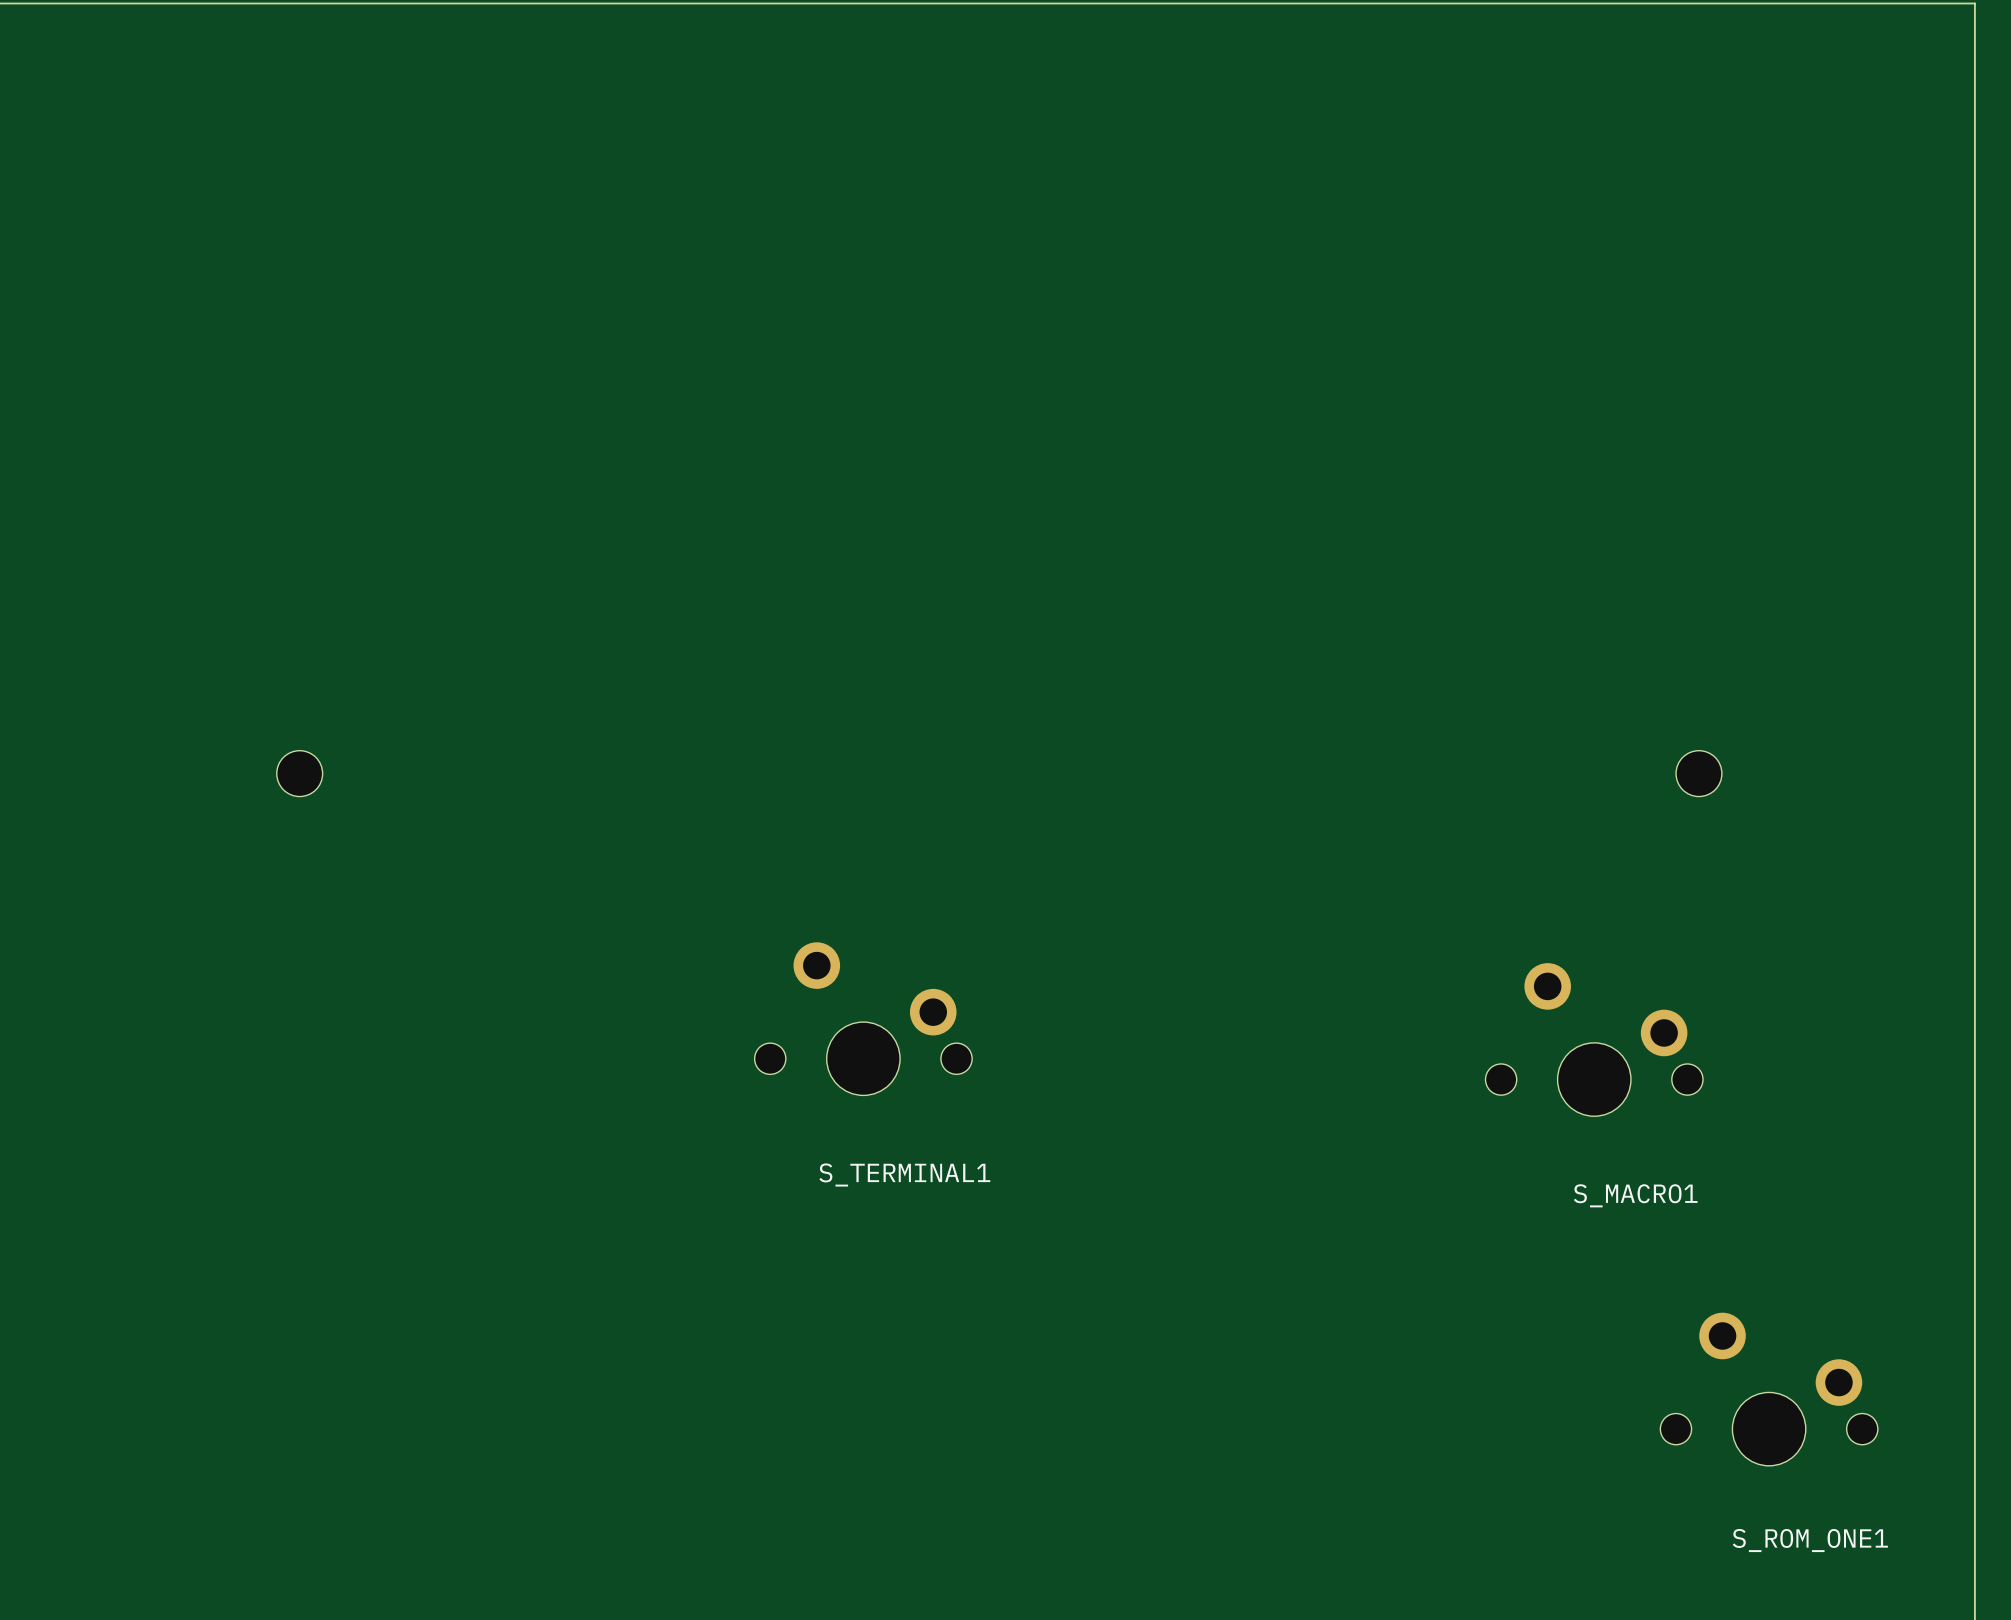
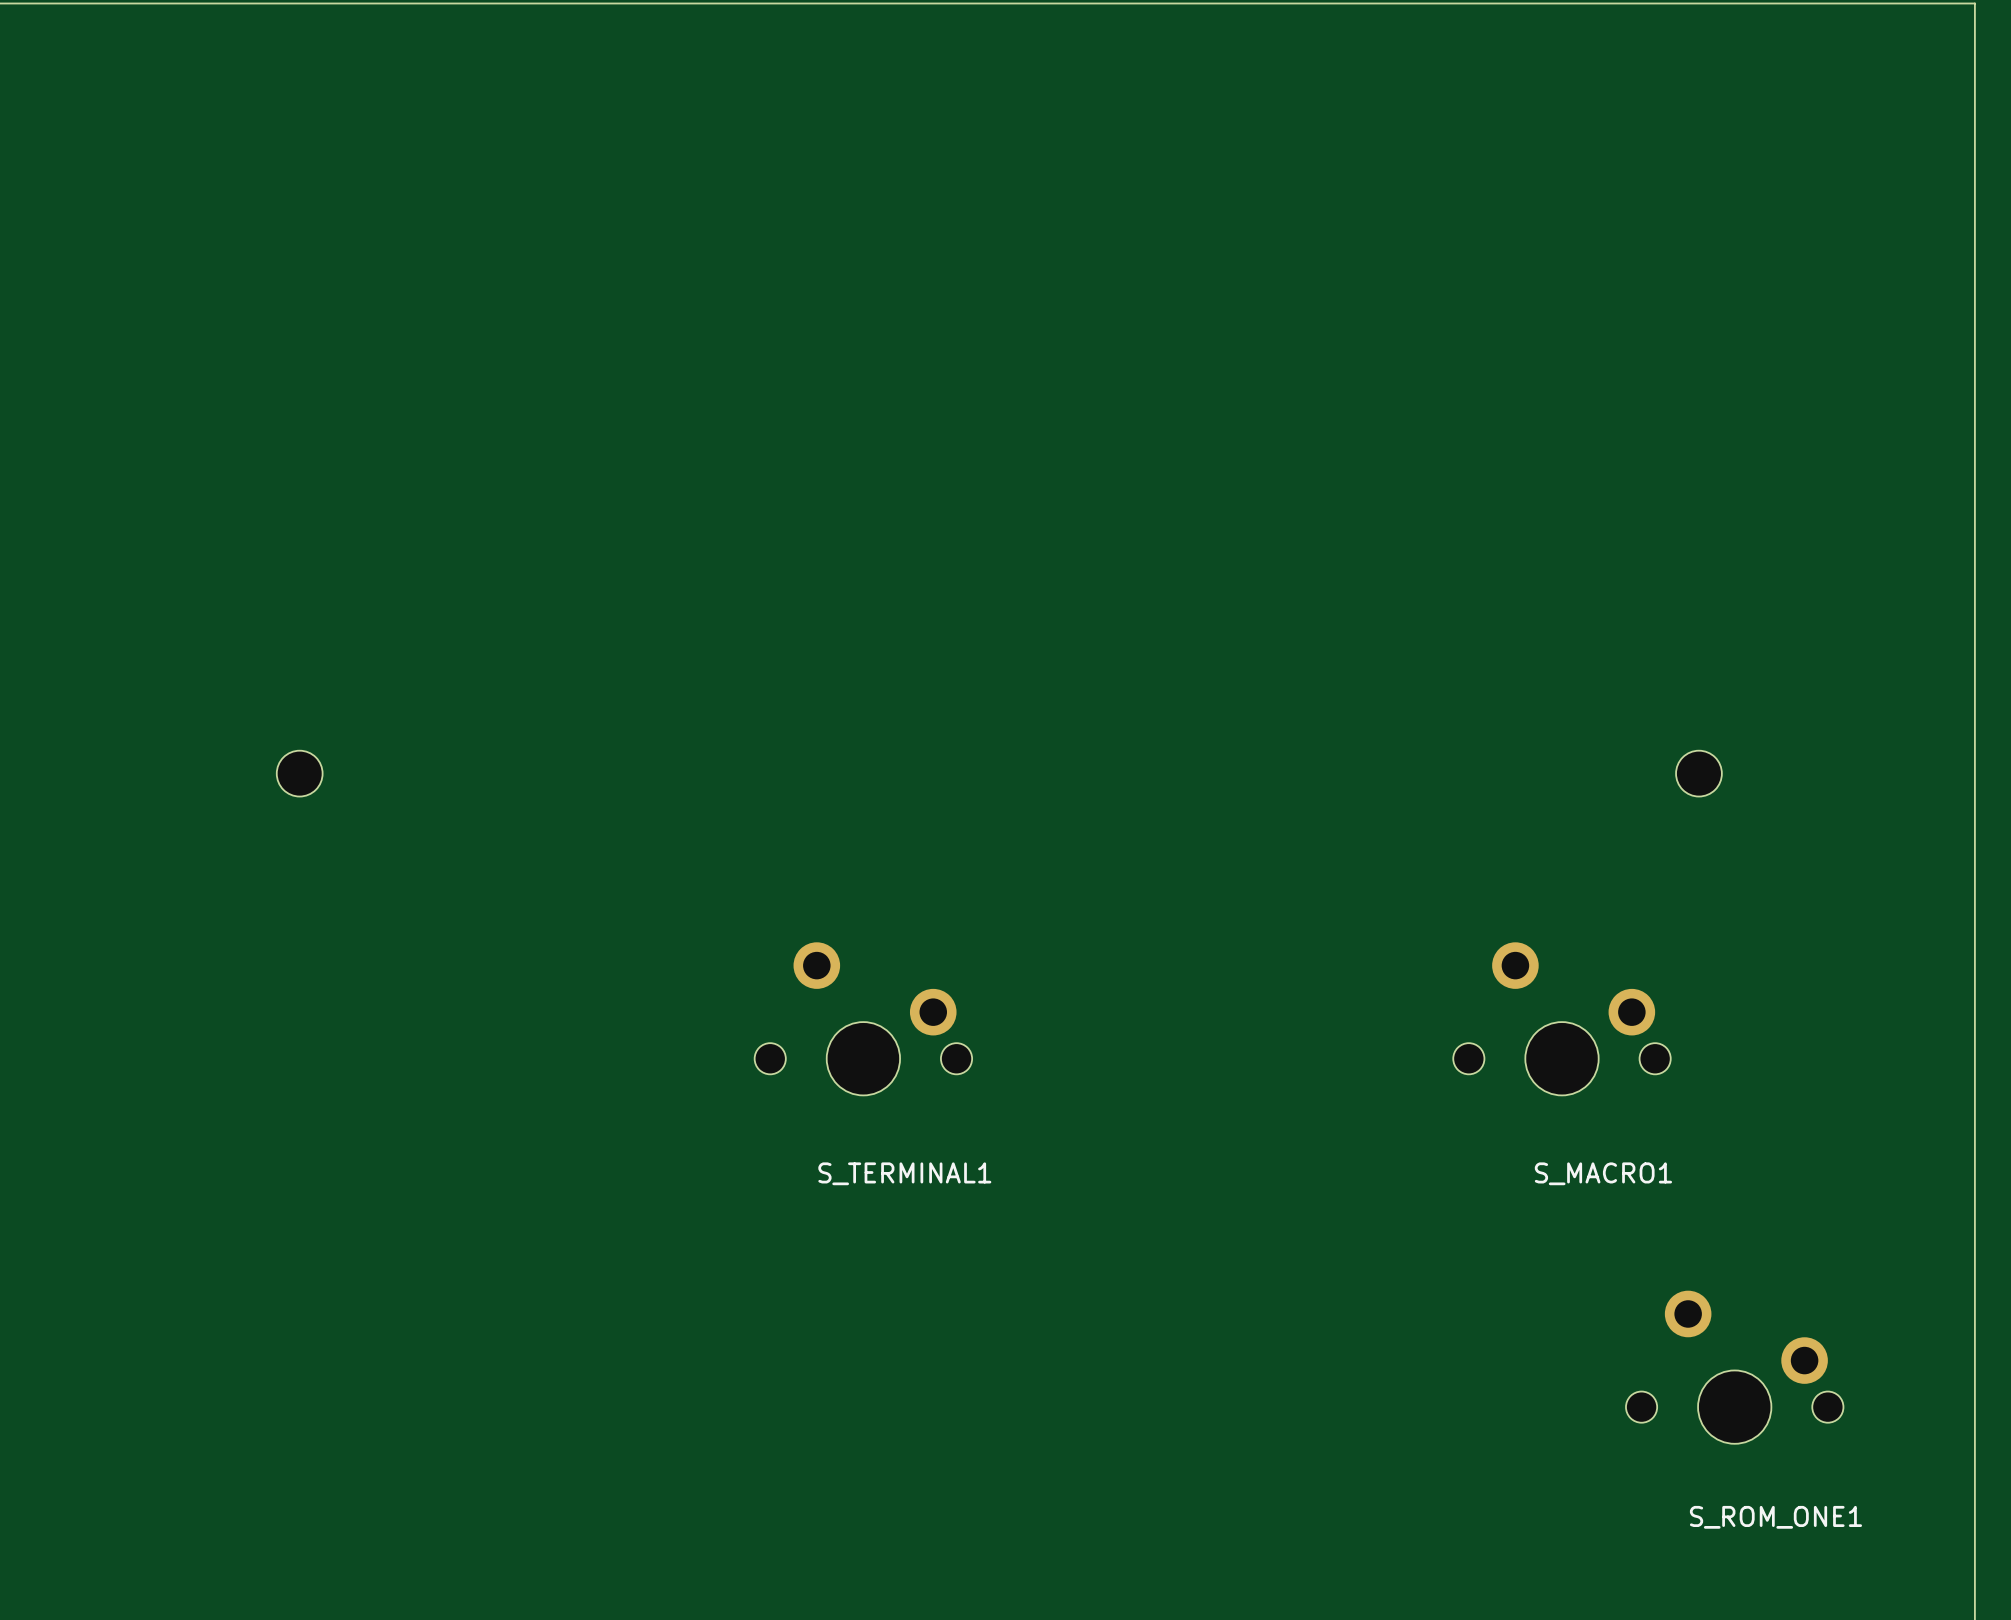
S_MACRO1 position: (1594, 1039) -> (1561, 1018)
S_ROM_ONE1 position: (1769, 1389) -> (1734, 1367)

